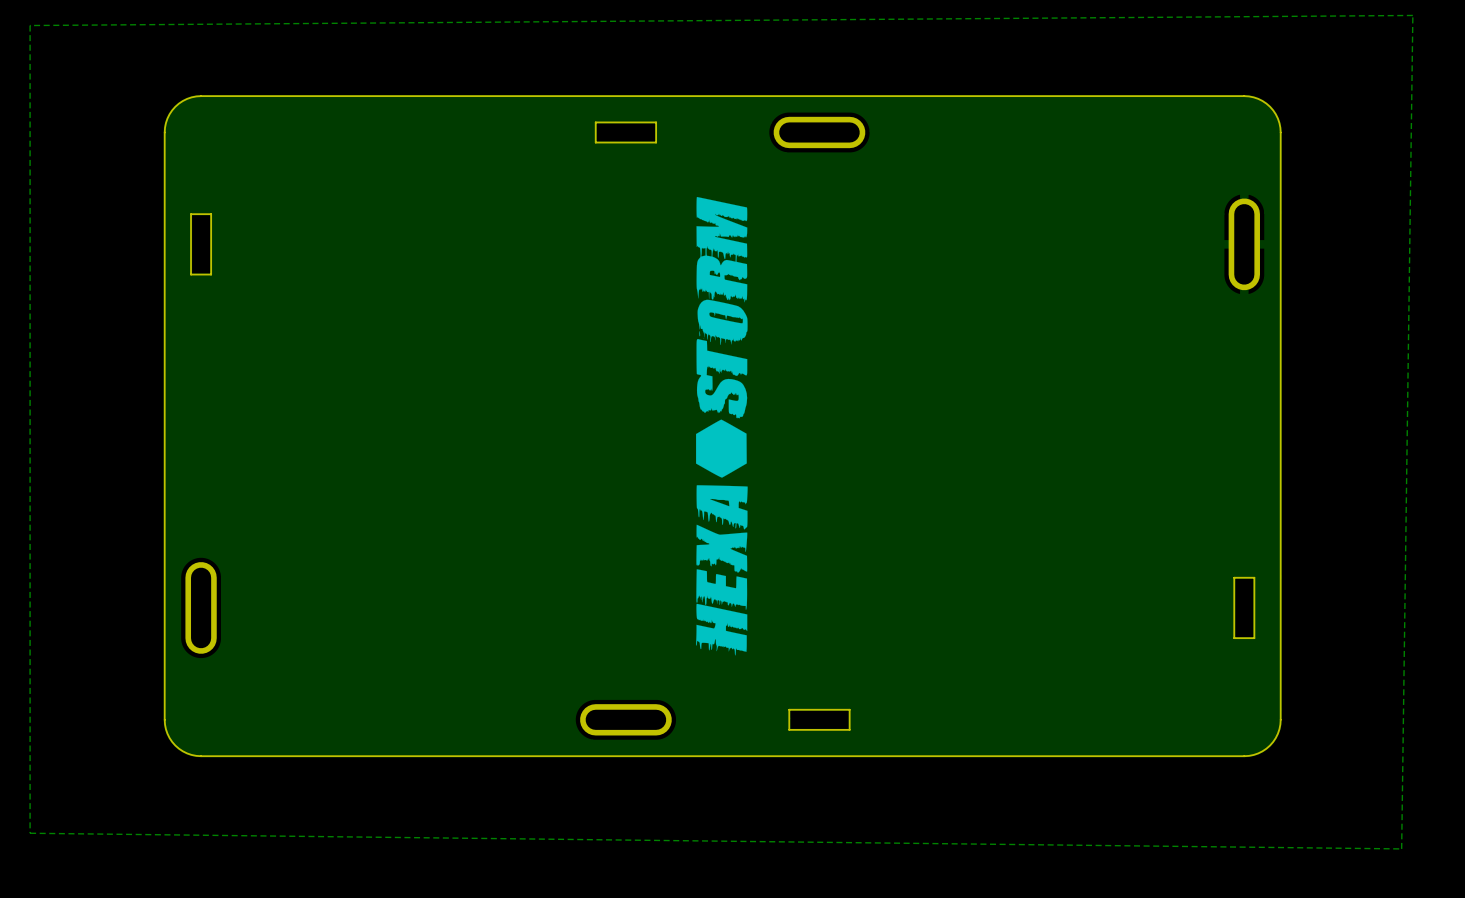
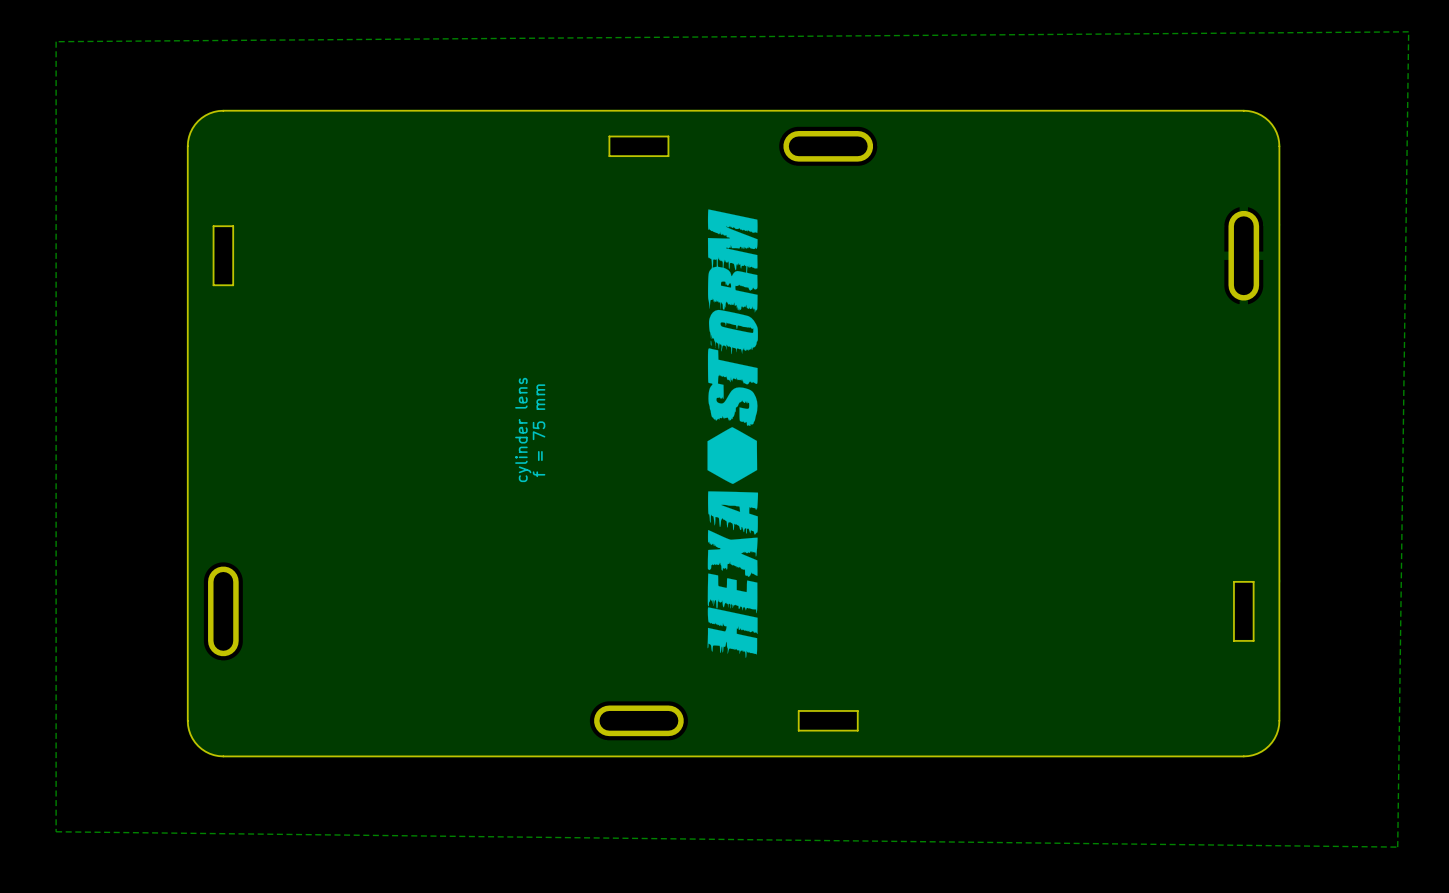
text: none -> cylinder lens (523, 429)
text: none -> f = 75 mm (539, 430)

